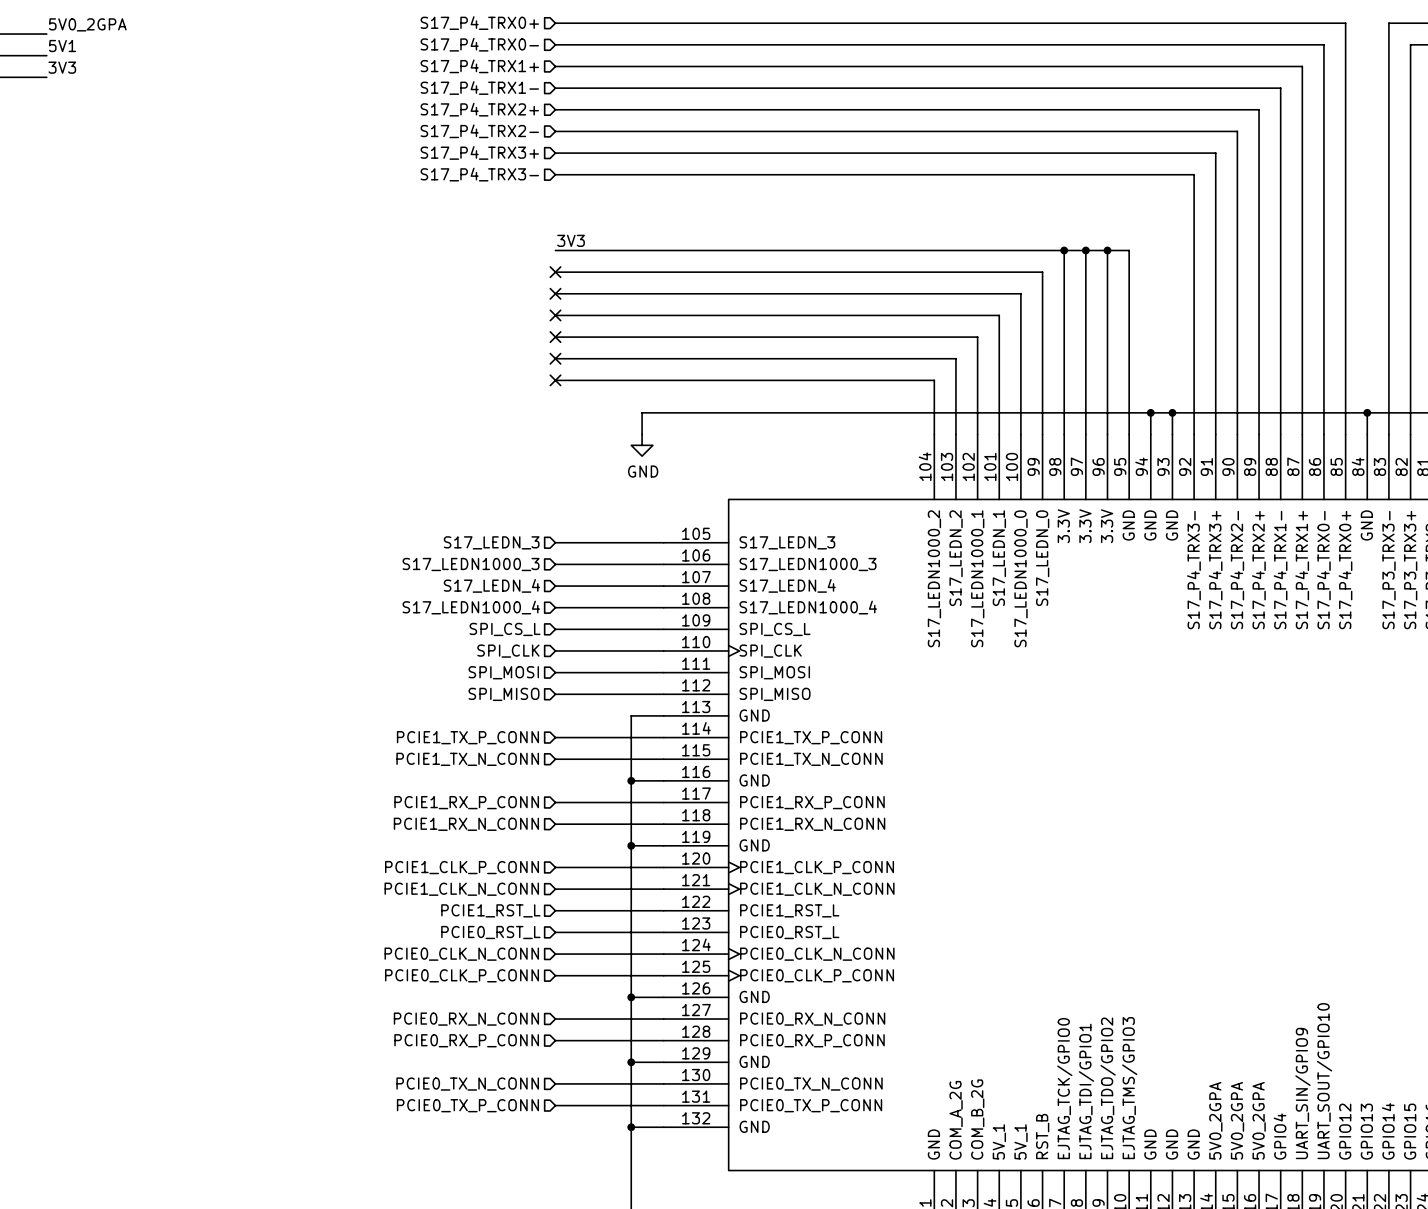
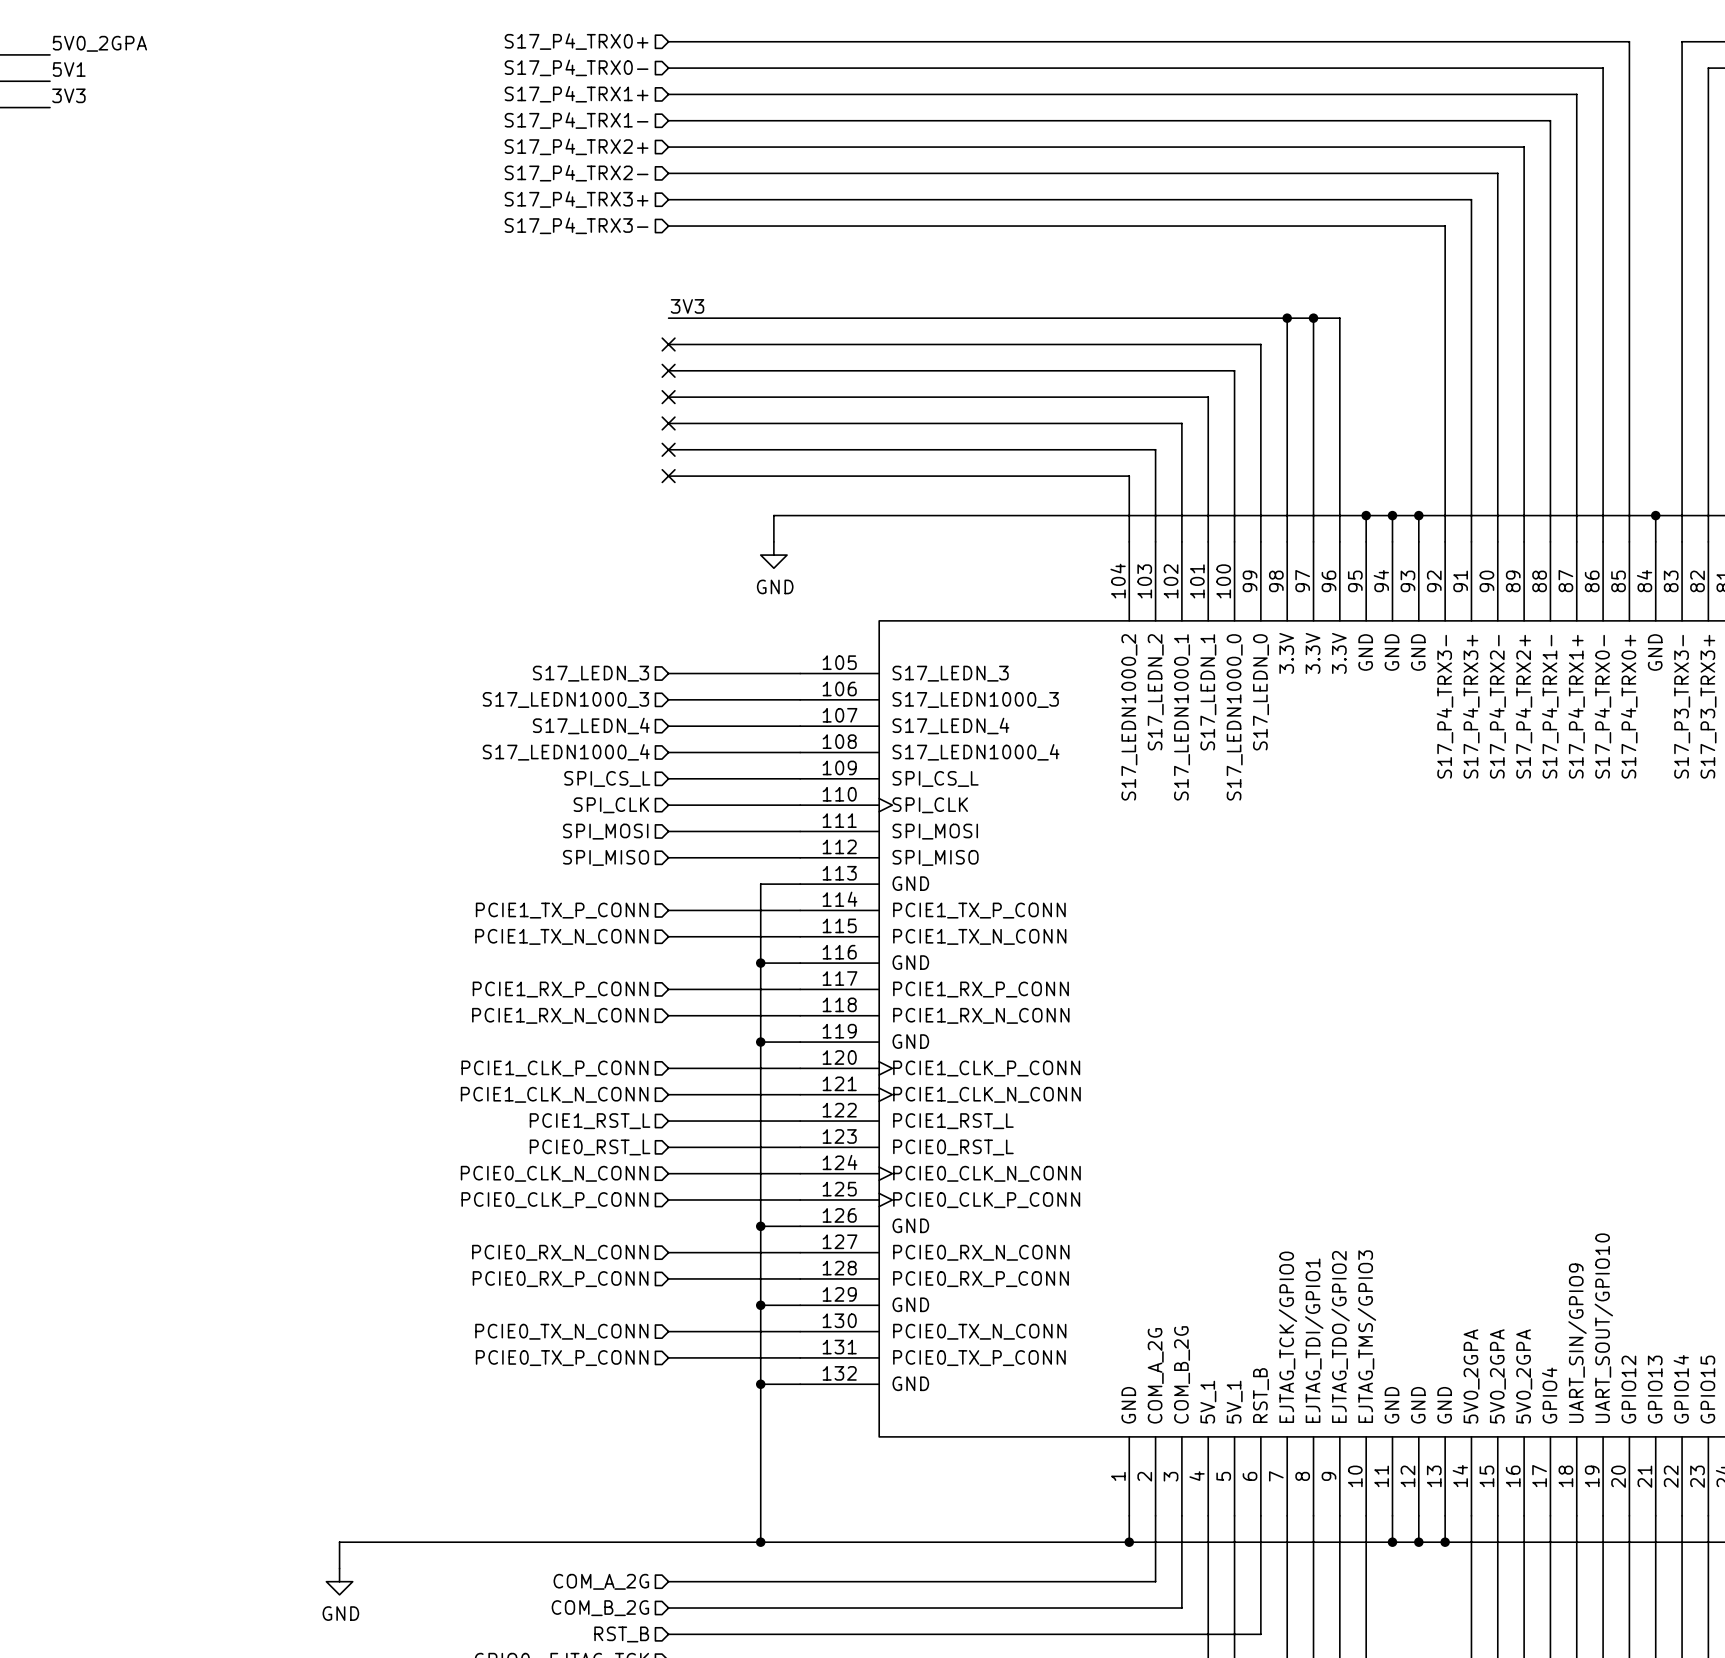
wire: (1107, 250) (1129, 250) (1129, 412) -> none
junction: (1107, 250) -> none
junction: none -> (1366, 515)

